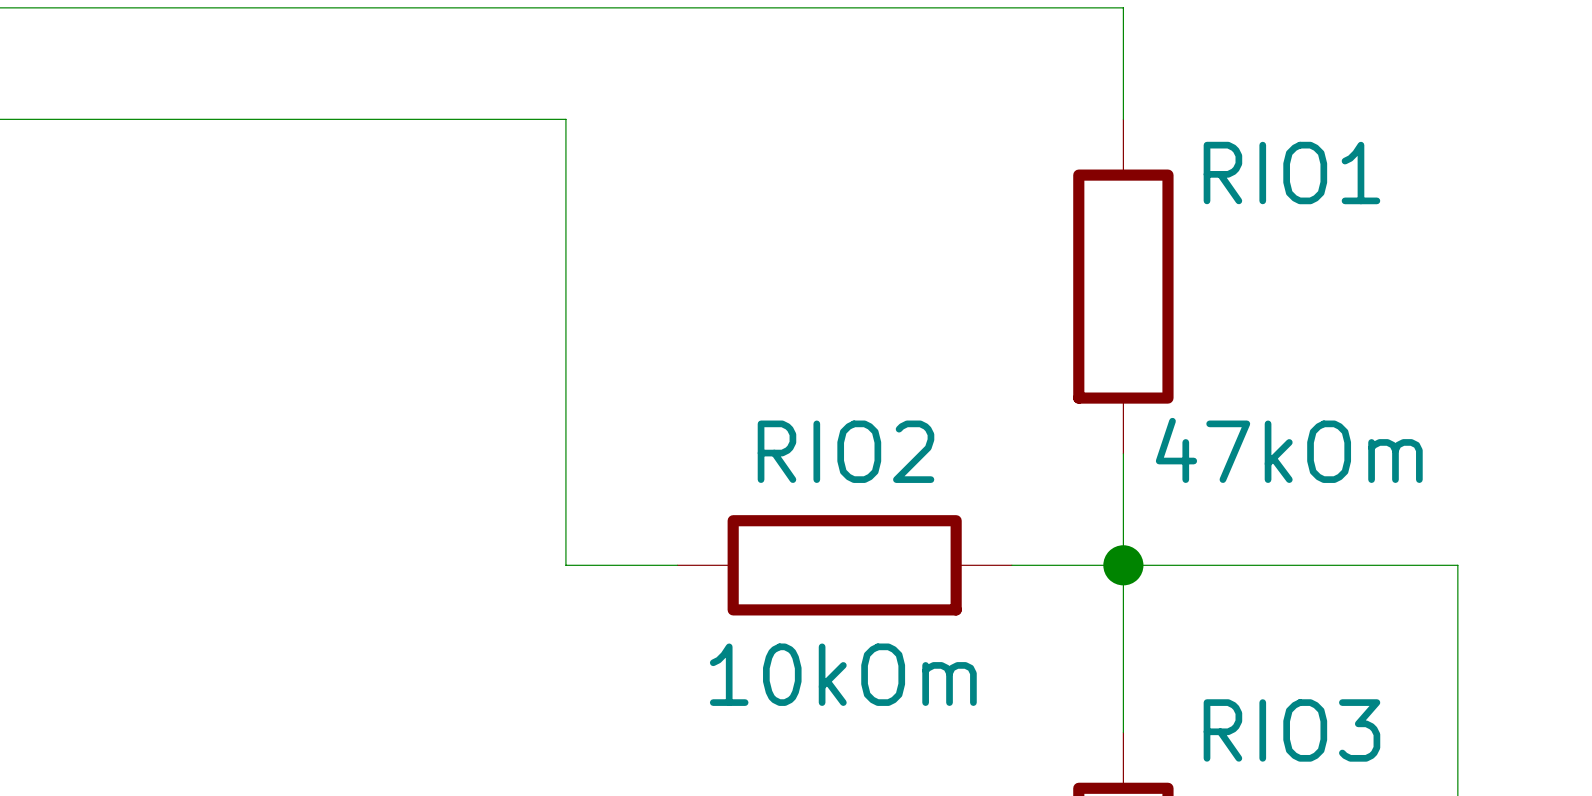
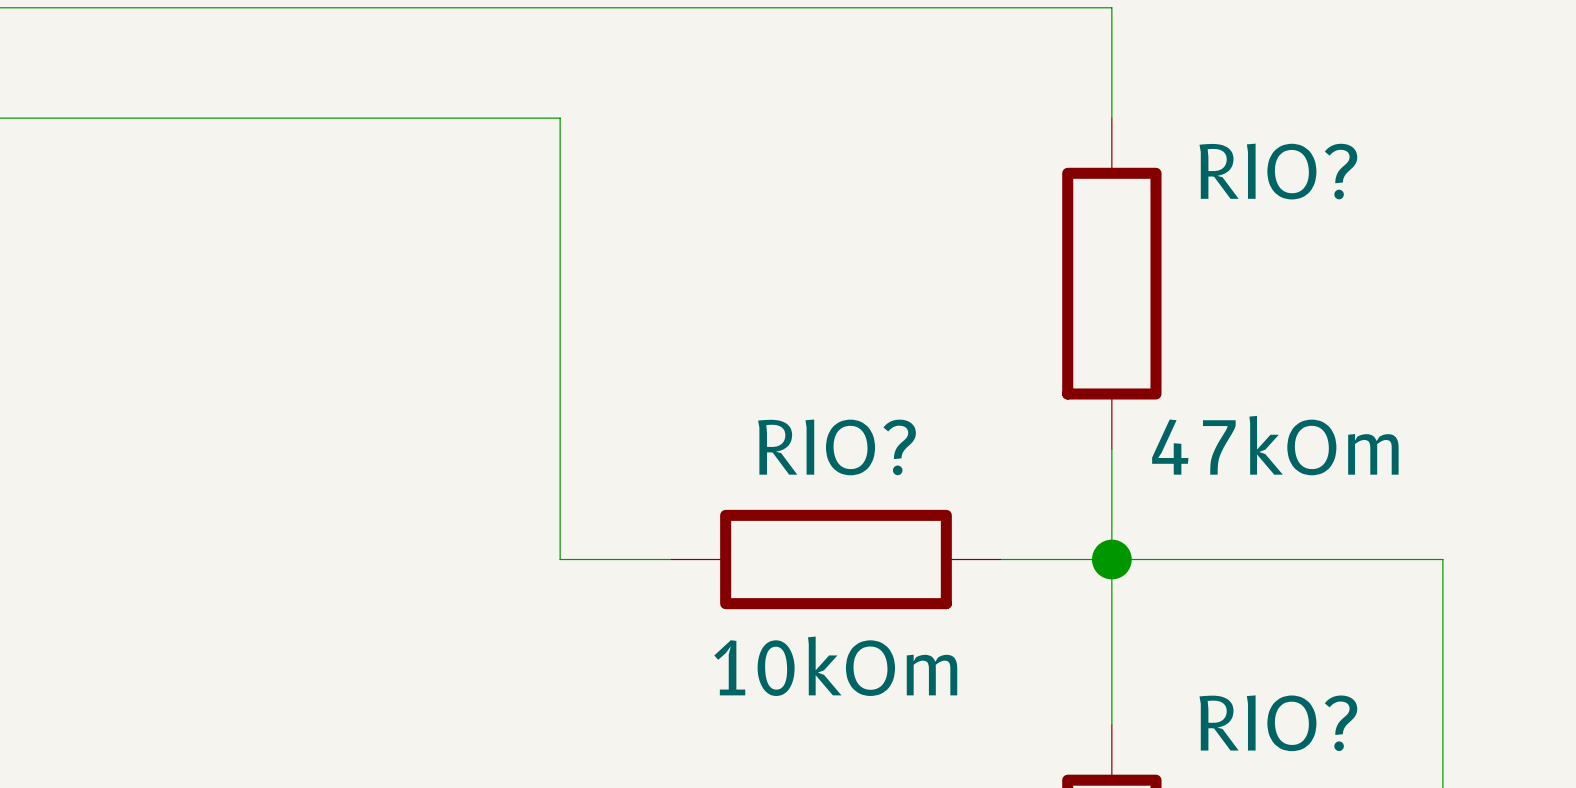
RIO1 name: RIO1 (1291, 173) -> RIO? (1278, 171)
RIO2 name: RIO2 (845, 451) -> RIO? (836, 447)
RIO3 name: RIO3 (1291, 730) -> RIO? (1278, 723)

